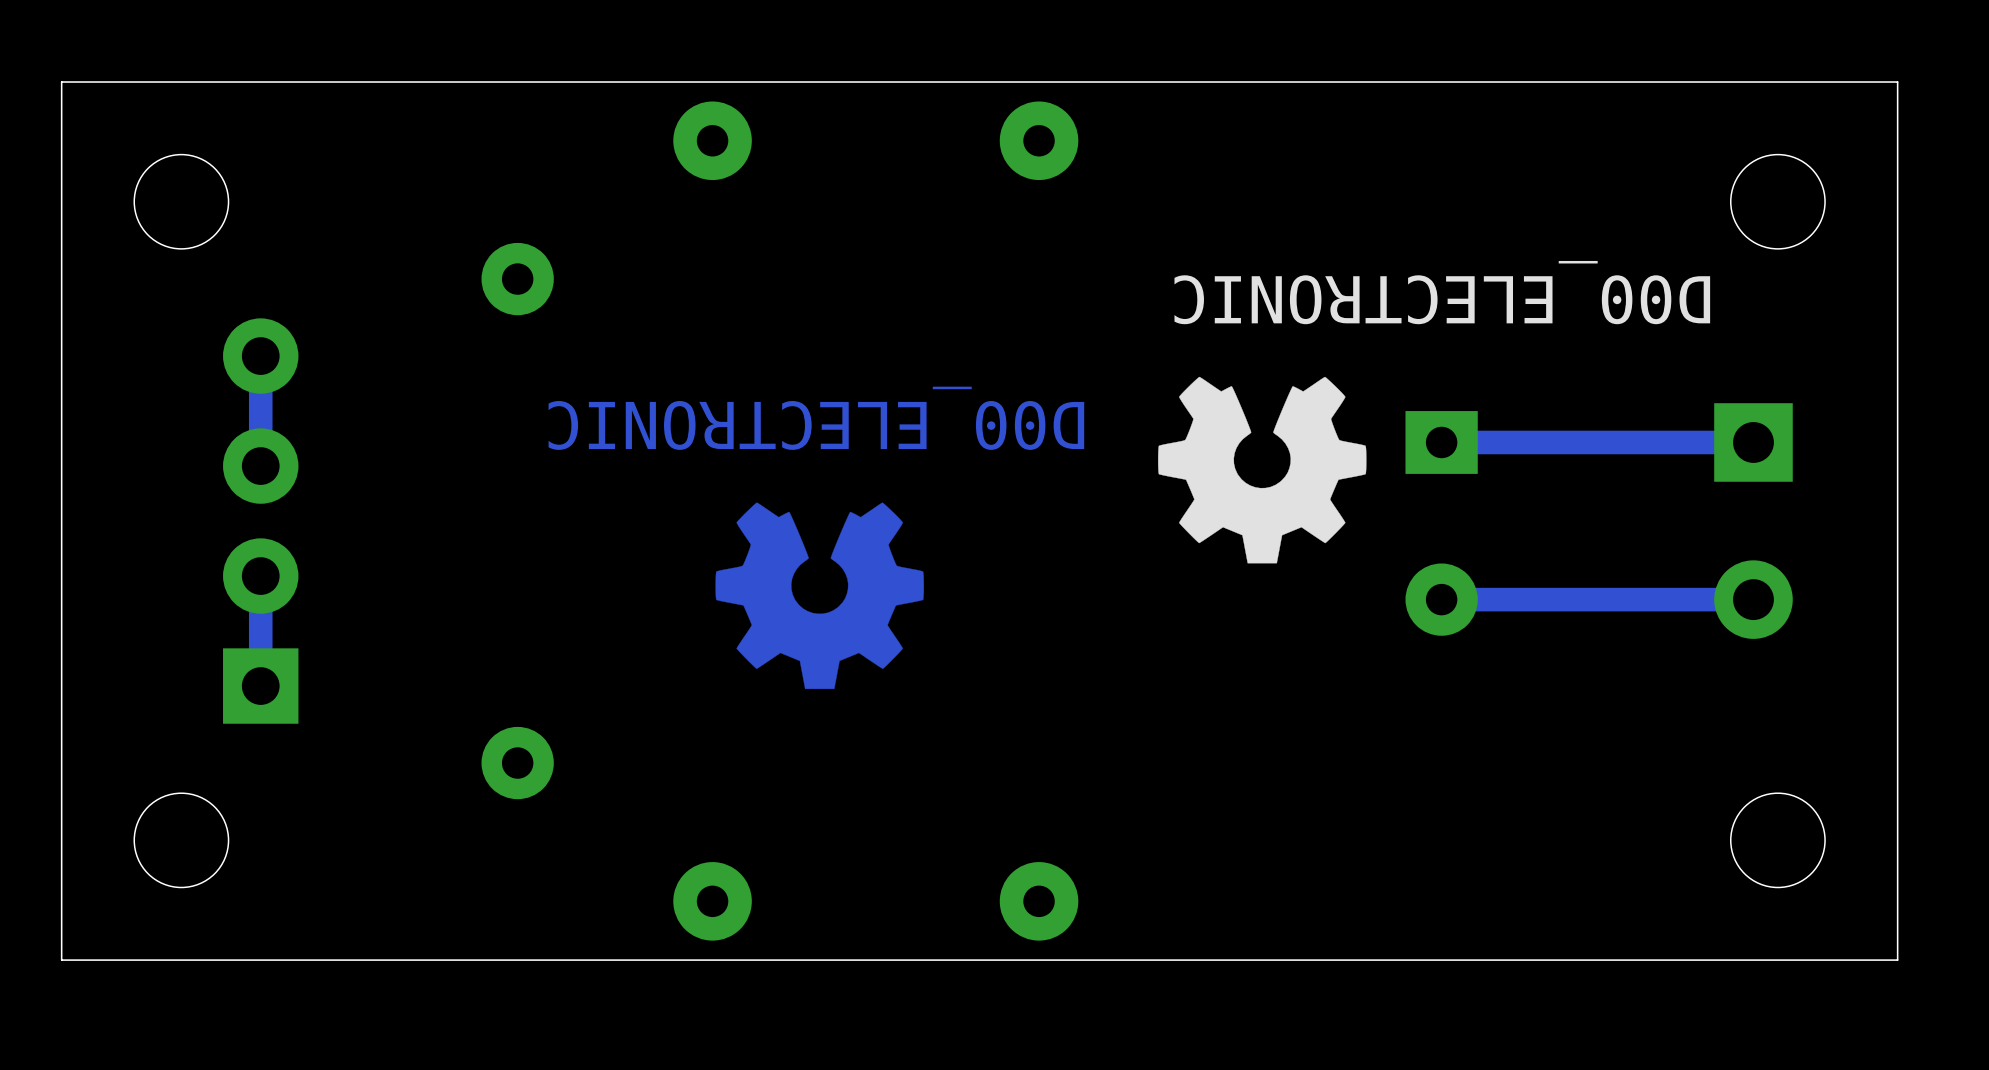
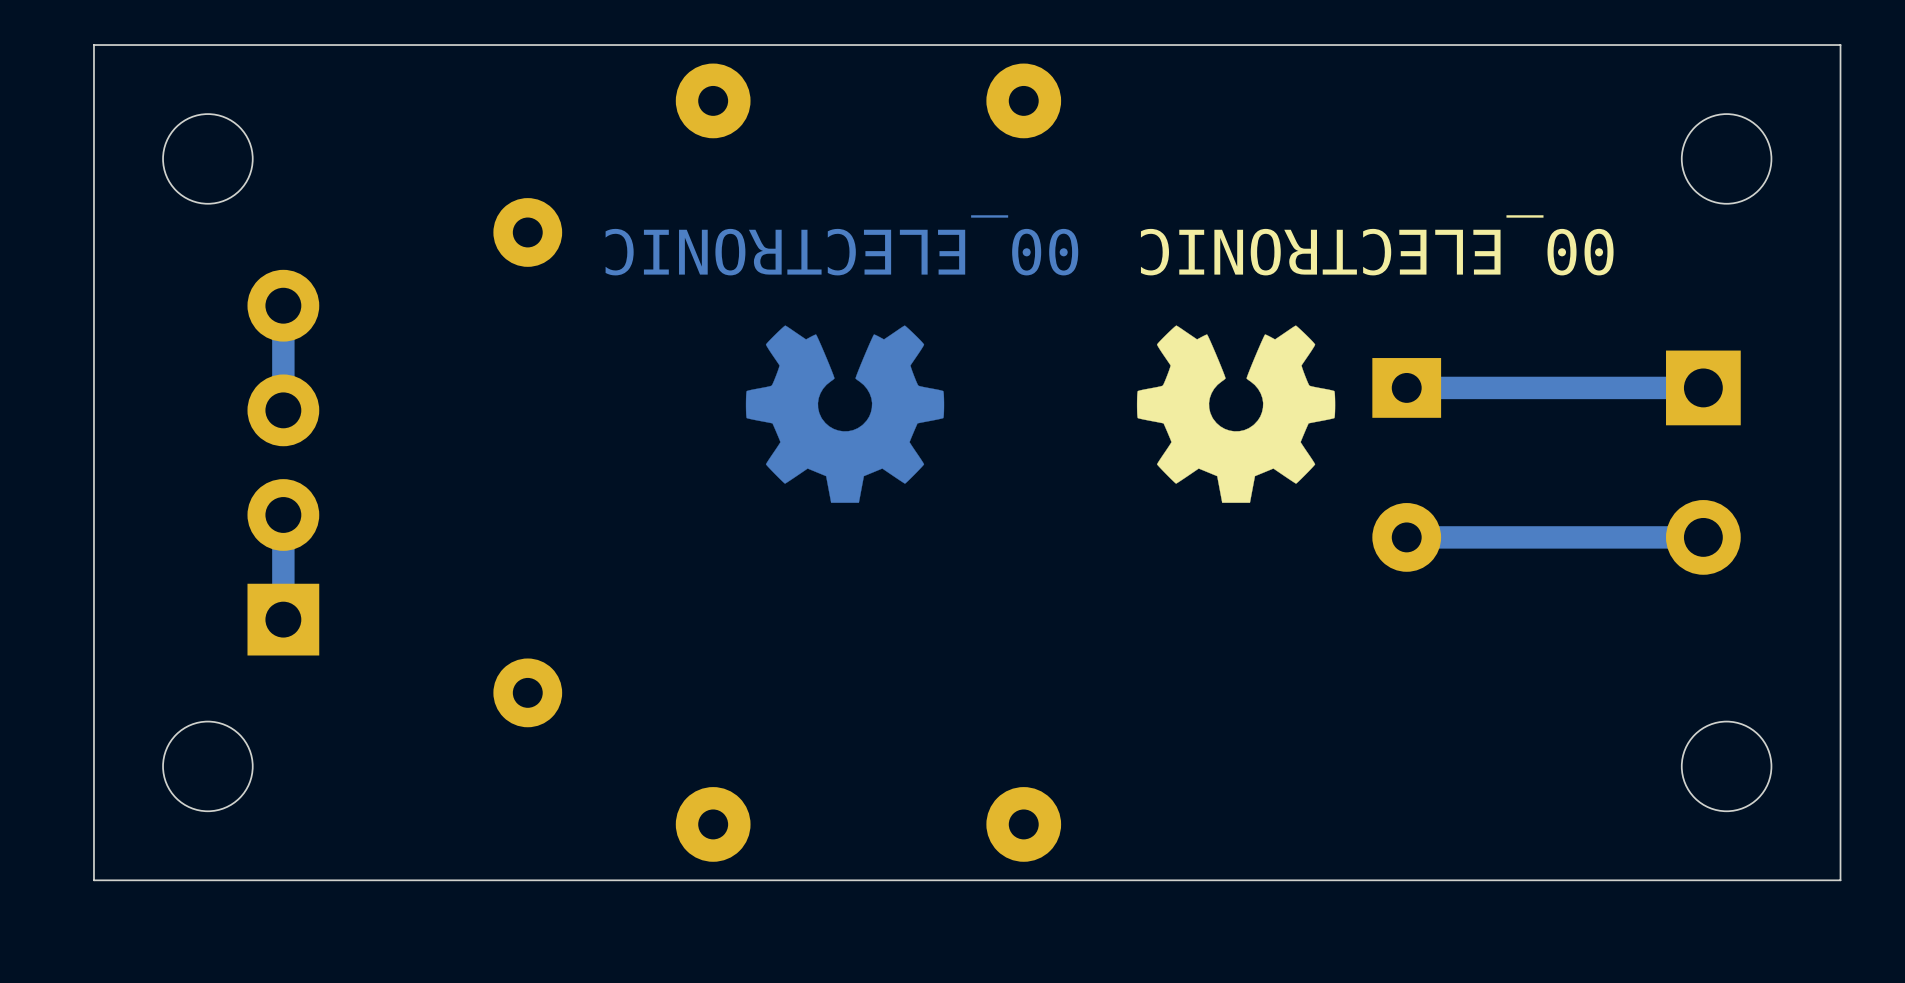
text: none -> 00_ELECTRONIC (841, 245)
text: D00_ELECTRONIC (1442, 292) -> 00_ELECTRONIC (1377, 245)
text: D00_ELECTRONIC (816, 418) -> none
drawing position: (819, 595) -> (845, 414)

